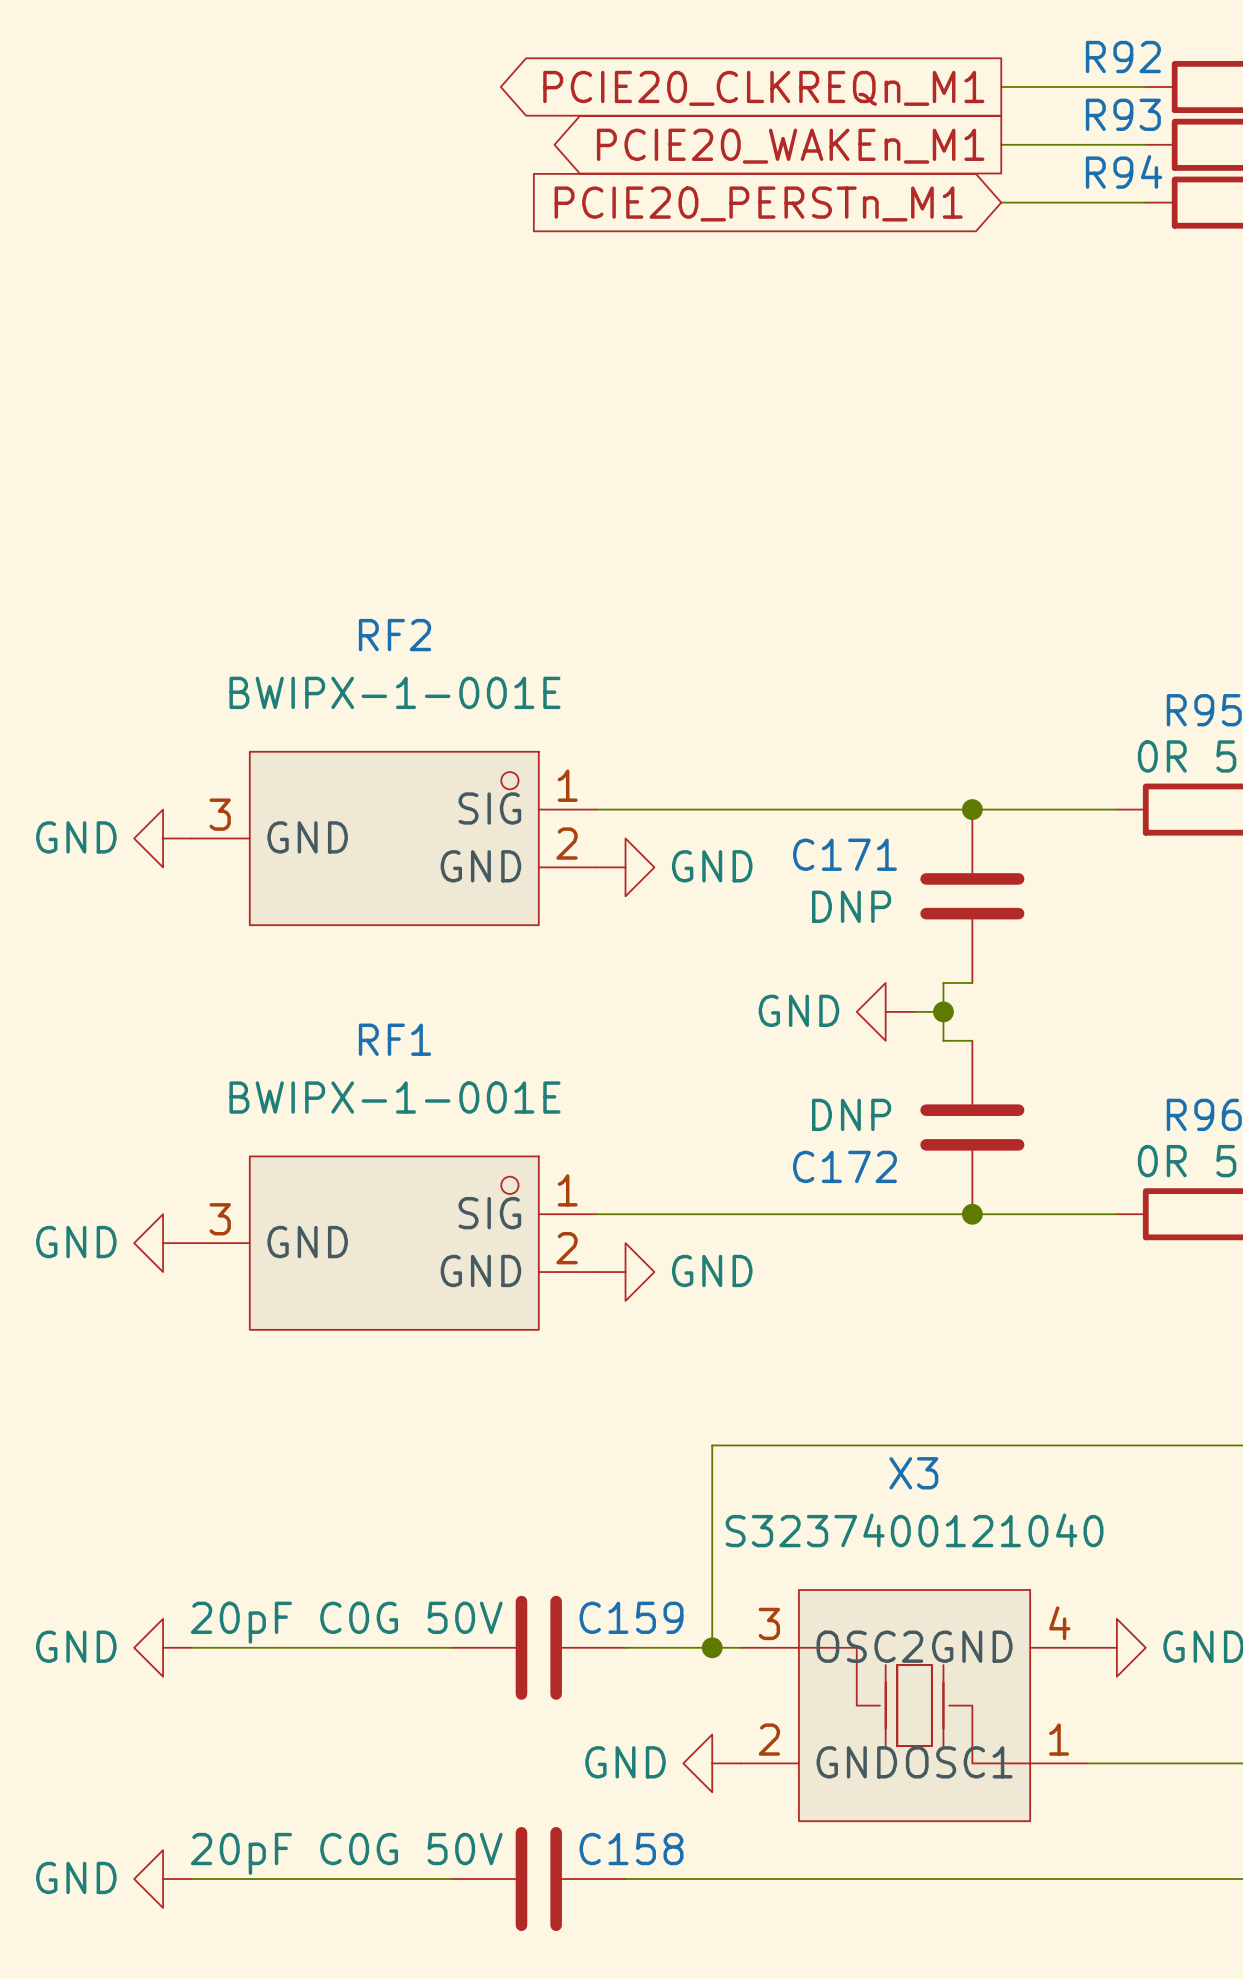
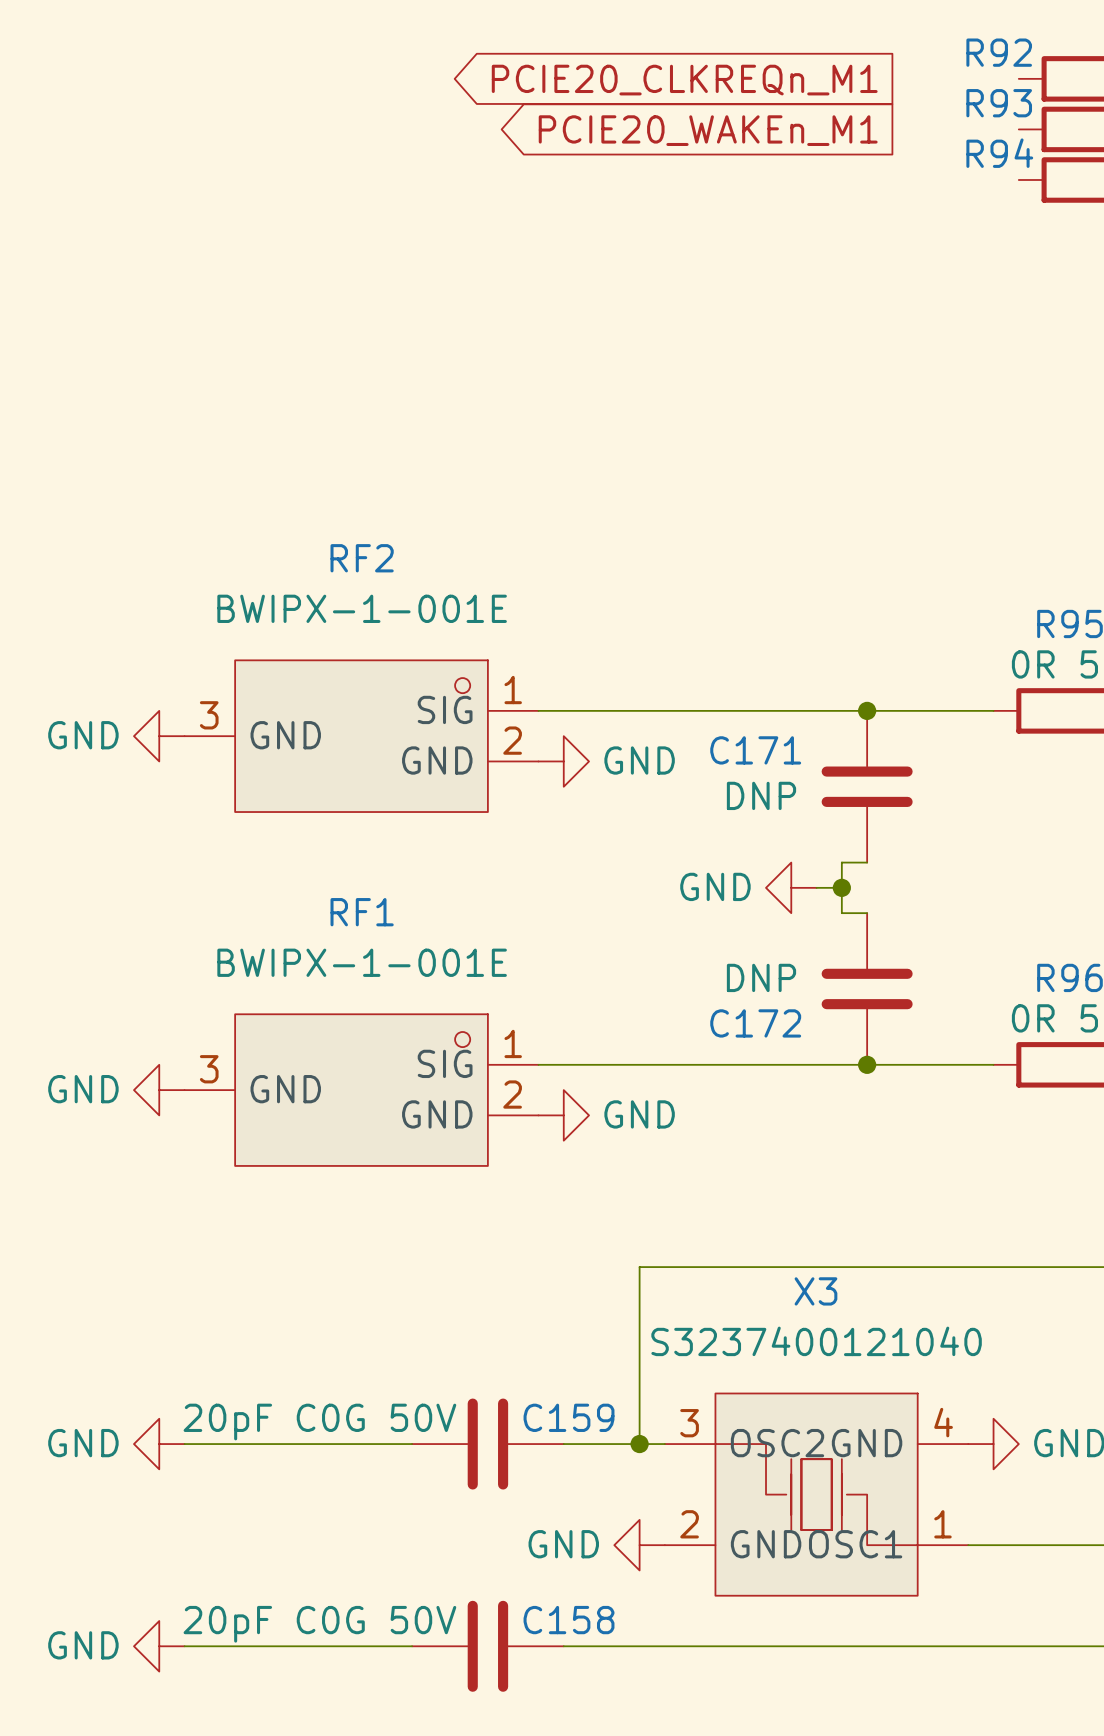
wire: (1001, 86) (1145, 86) -> none
wire: (1001, 144) (1145, 144) -> none
wire: (1001, 202) (1145, 202) -> none
global label: PCIE20_PERSTn_M1 (758, 203) -> none

